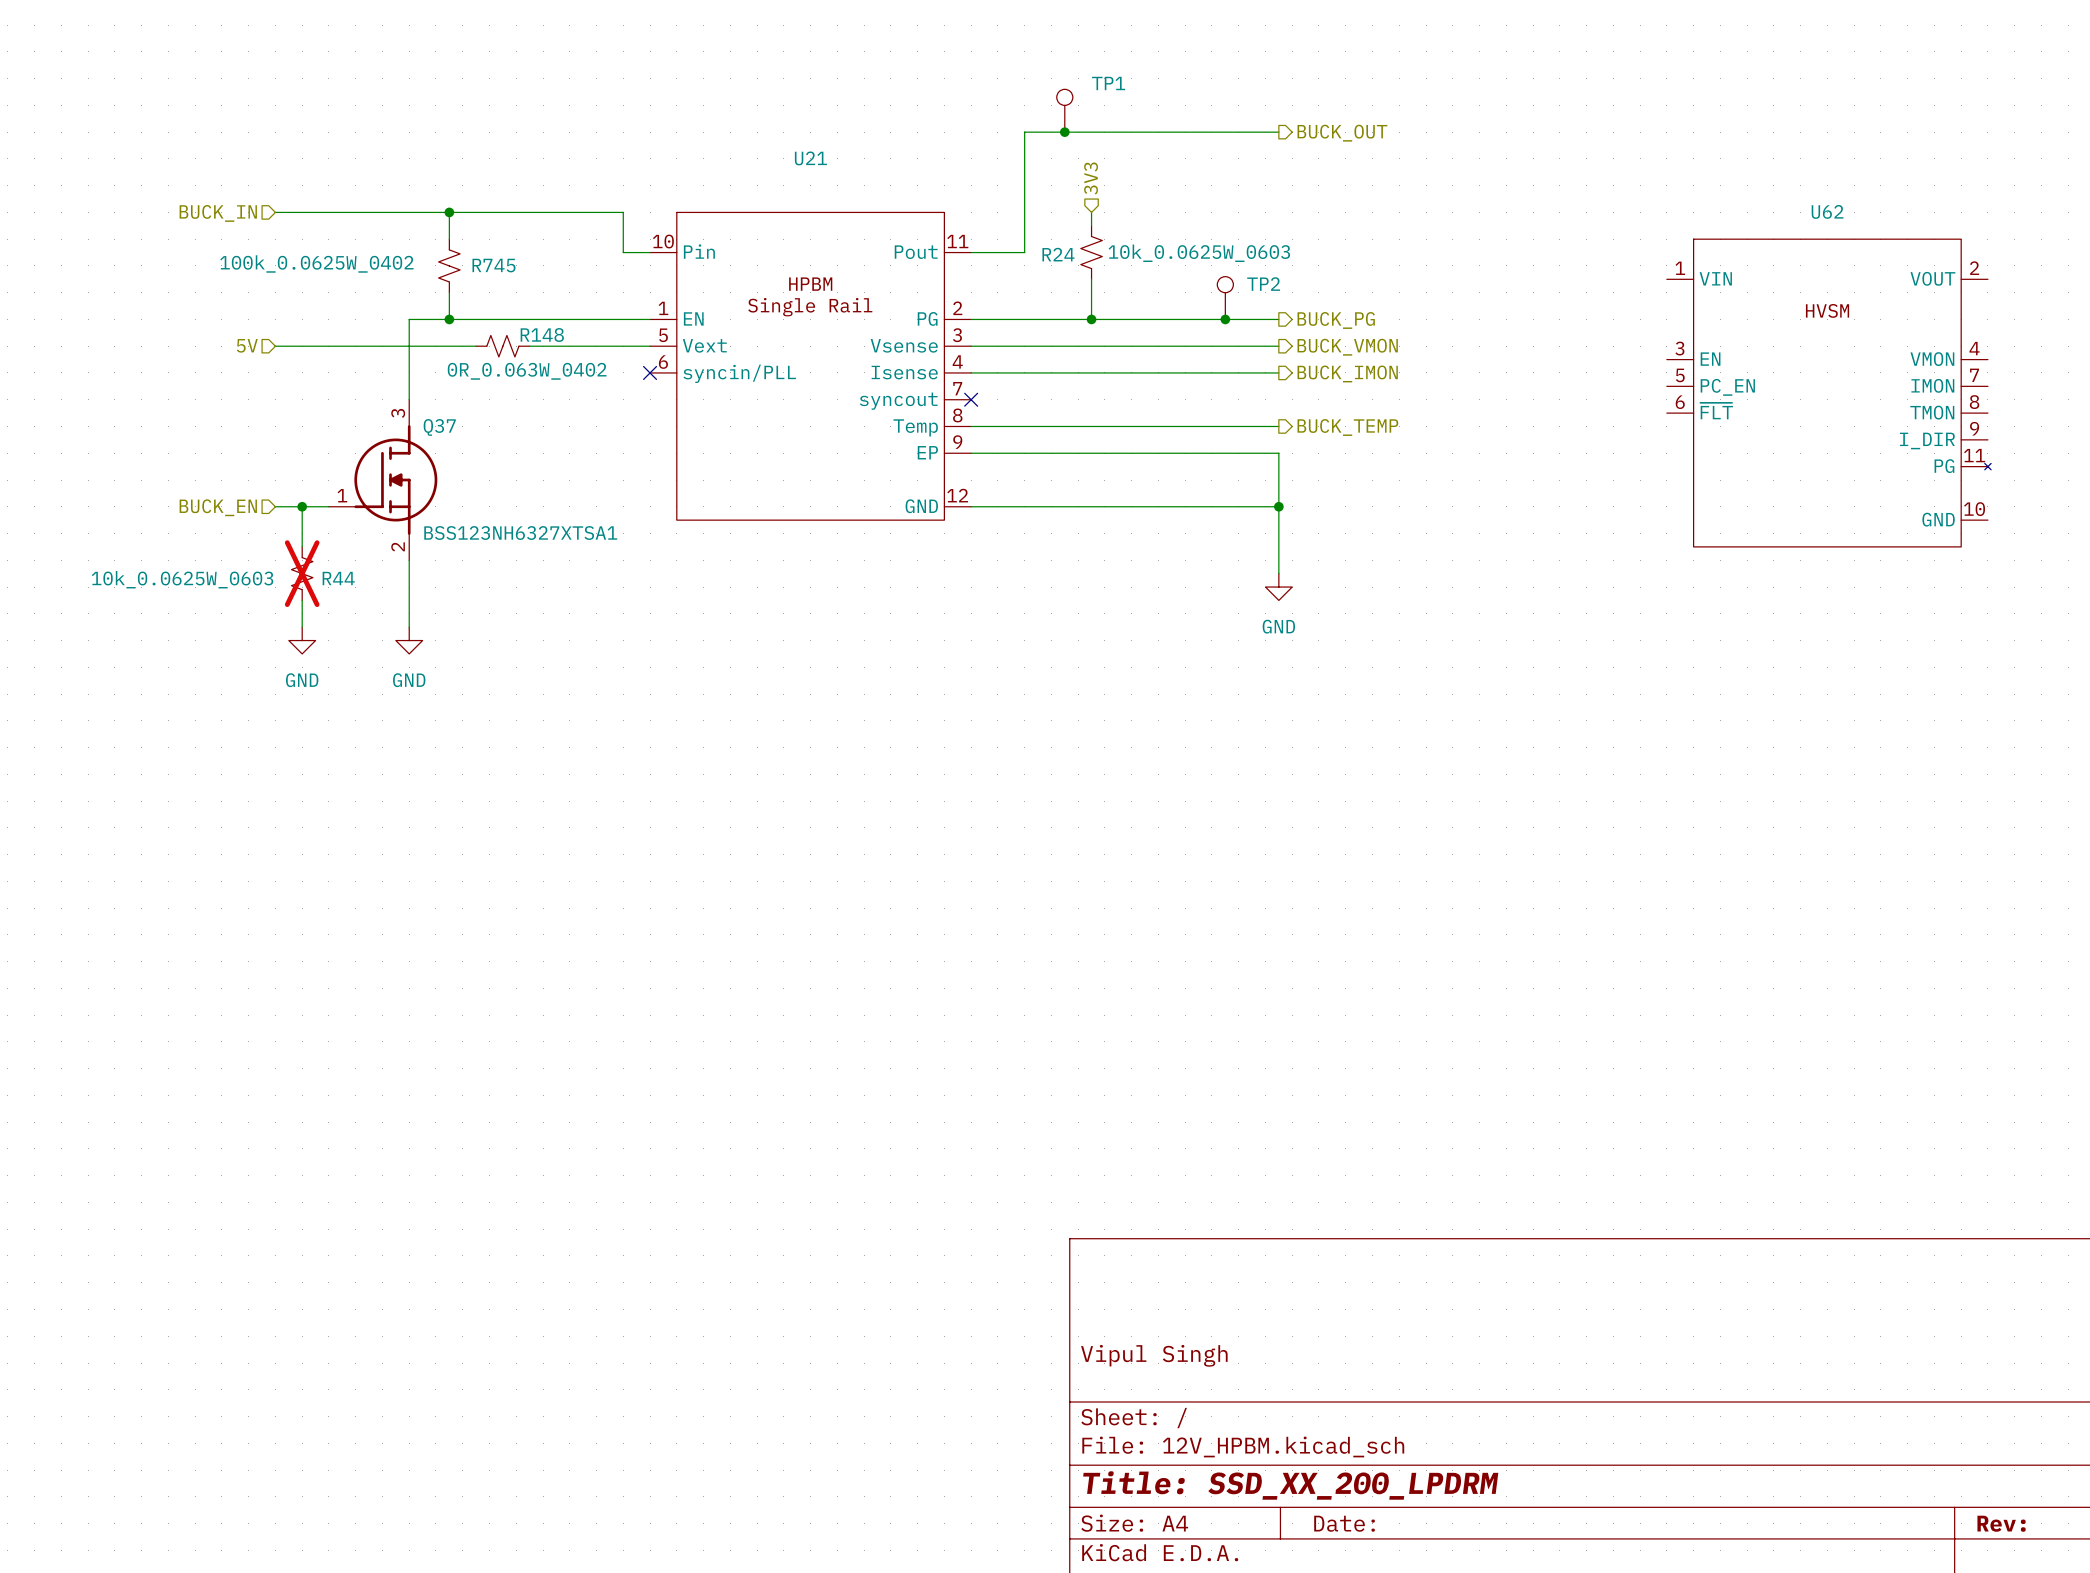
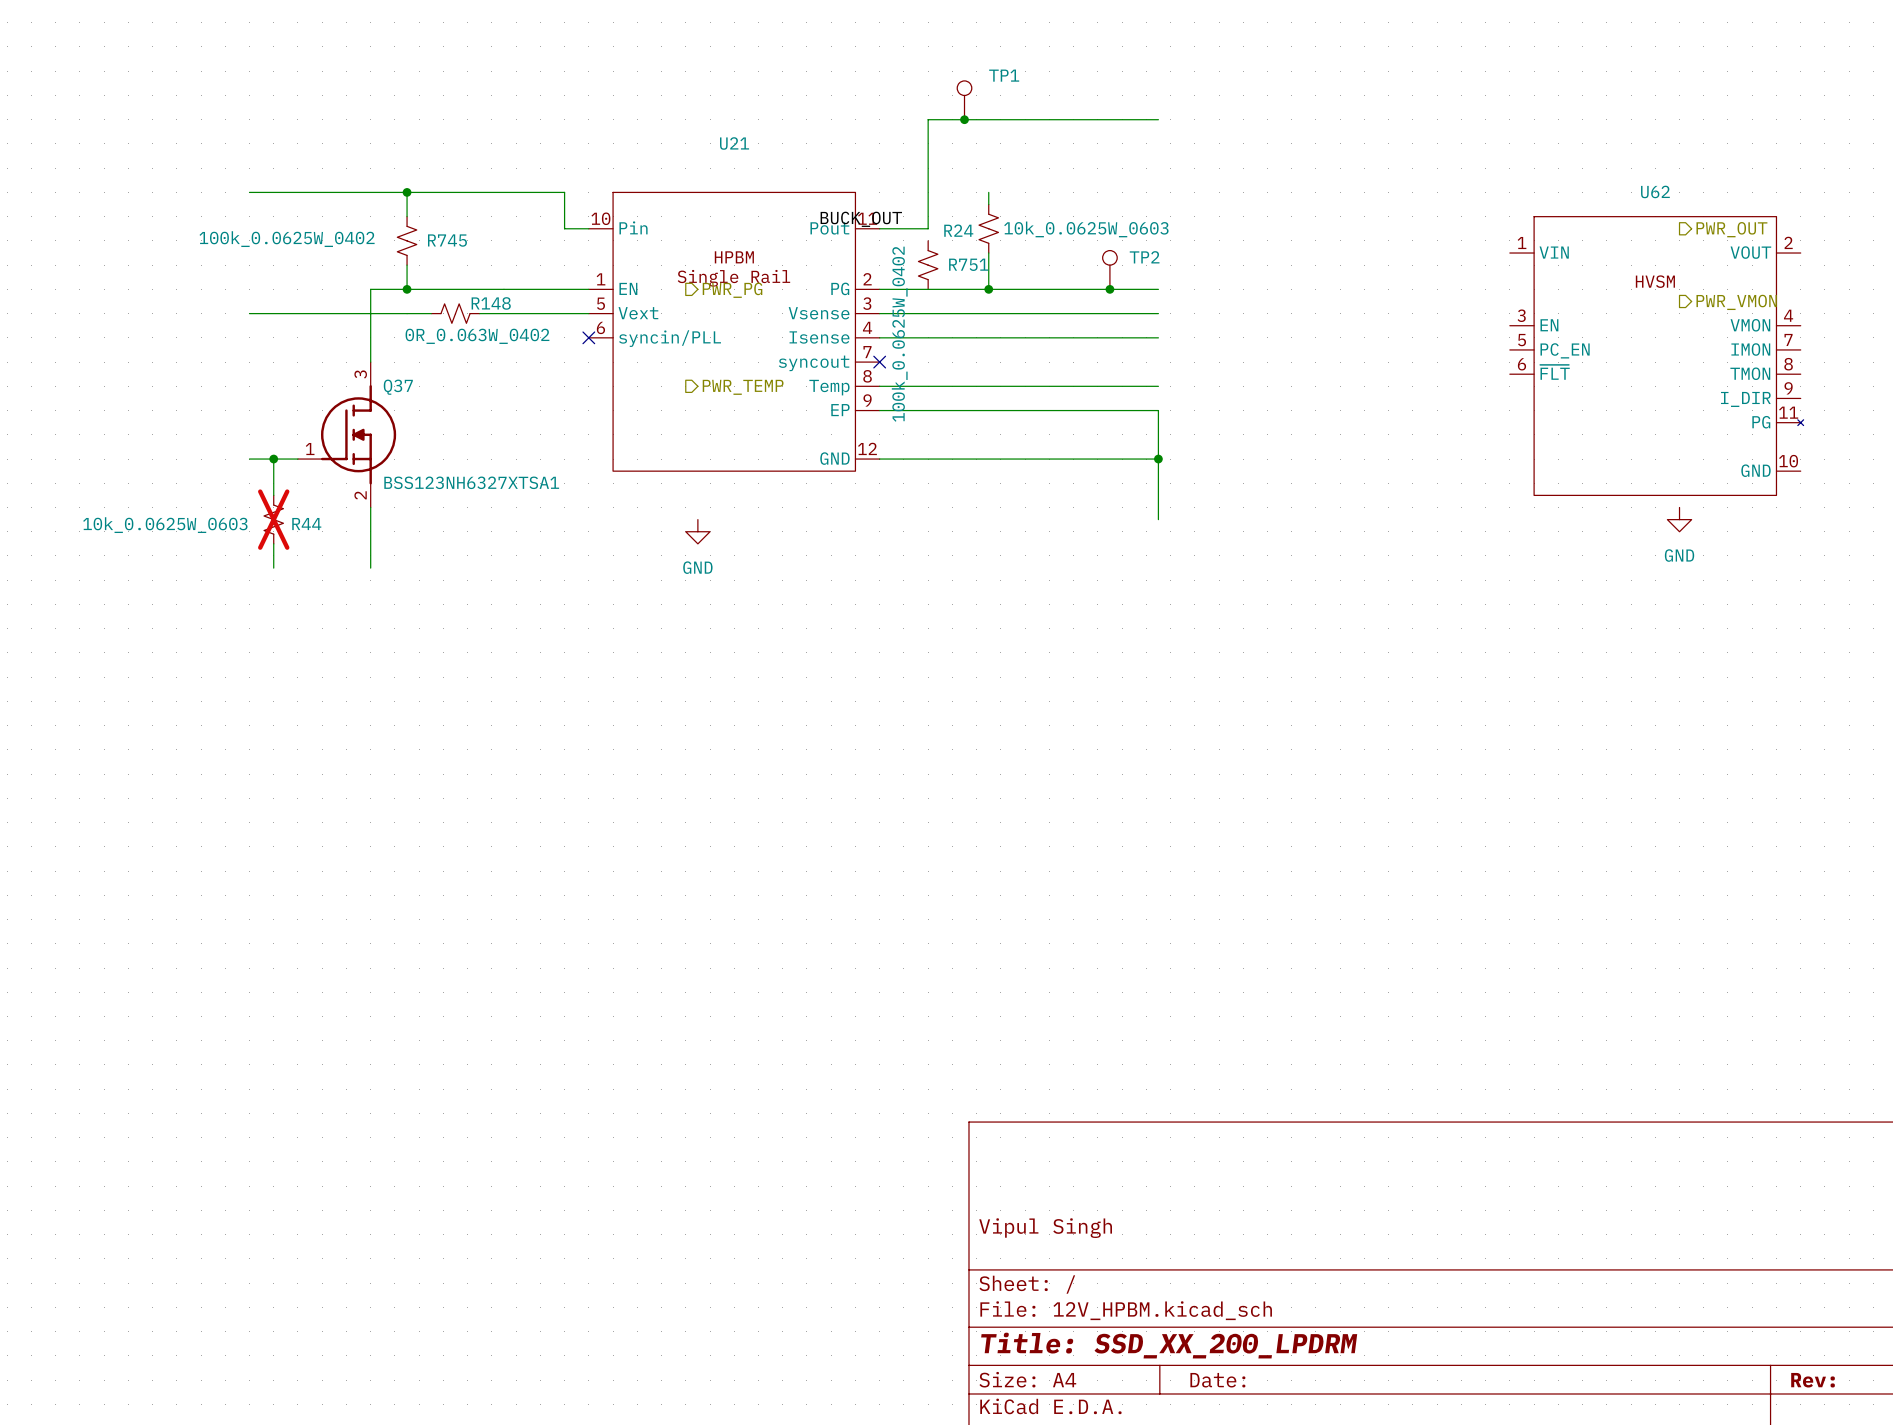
hierarchical label: BUCK_OUT (1342, 133) -> none
hierarchical label: 3V3 (1091, 178) -> none
hierarchical label: BUCK_IN (218, 213) -> none
label: none -> BUCK_OUT (861, 219)
hierarchical label: none -> PWR_OUT (1731, 229)
R751: none -> 100k_0.0625W_0402 (928, 265)
hierarchical label: none -> PWR_PG (732, 290)
hierarchical label: BUCK_PG (1336, 320) -> none
hierarchical label: none -> PWR_VMON (1736, 302)
hierarchical label: 5V (247, 345) -> none
hierarchical label: BUCK_VMON (1347, 347) -> none
hierarchical label: BUCK_IMON (1347, 373) -> none
hierarchical label: none -> PWR_TEMP (743, 387)
hierarchical label: BUCK_TEMP (1347, 427) -> none
hierarchical label: BUCK_EN (218, 507) -> none
power symbol: none -> GND (1679, 519)
power symbol: none -> GND (697, 531)
power symbol: GND (1278, 587) -> none
power symbol: GND (302, 640) -> none
power symbol: GND (409, 640) -> none

